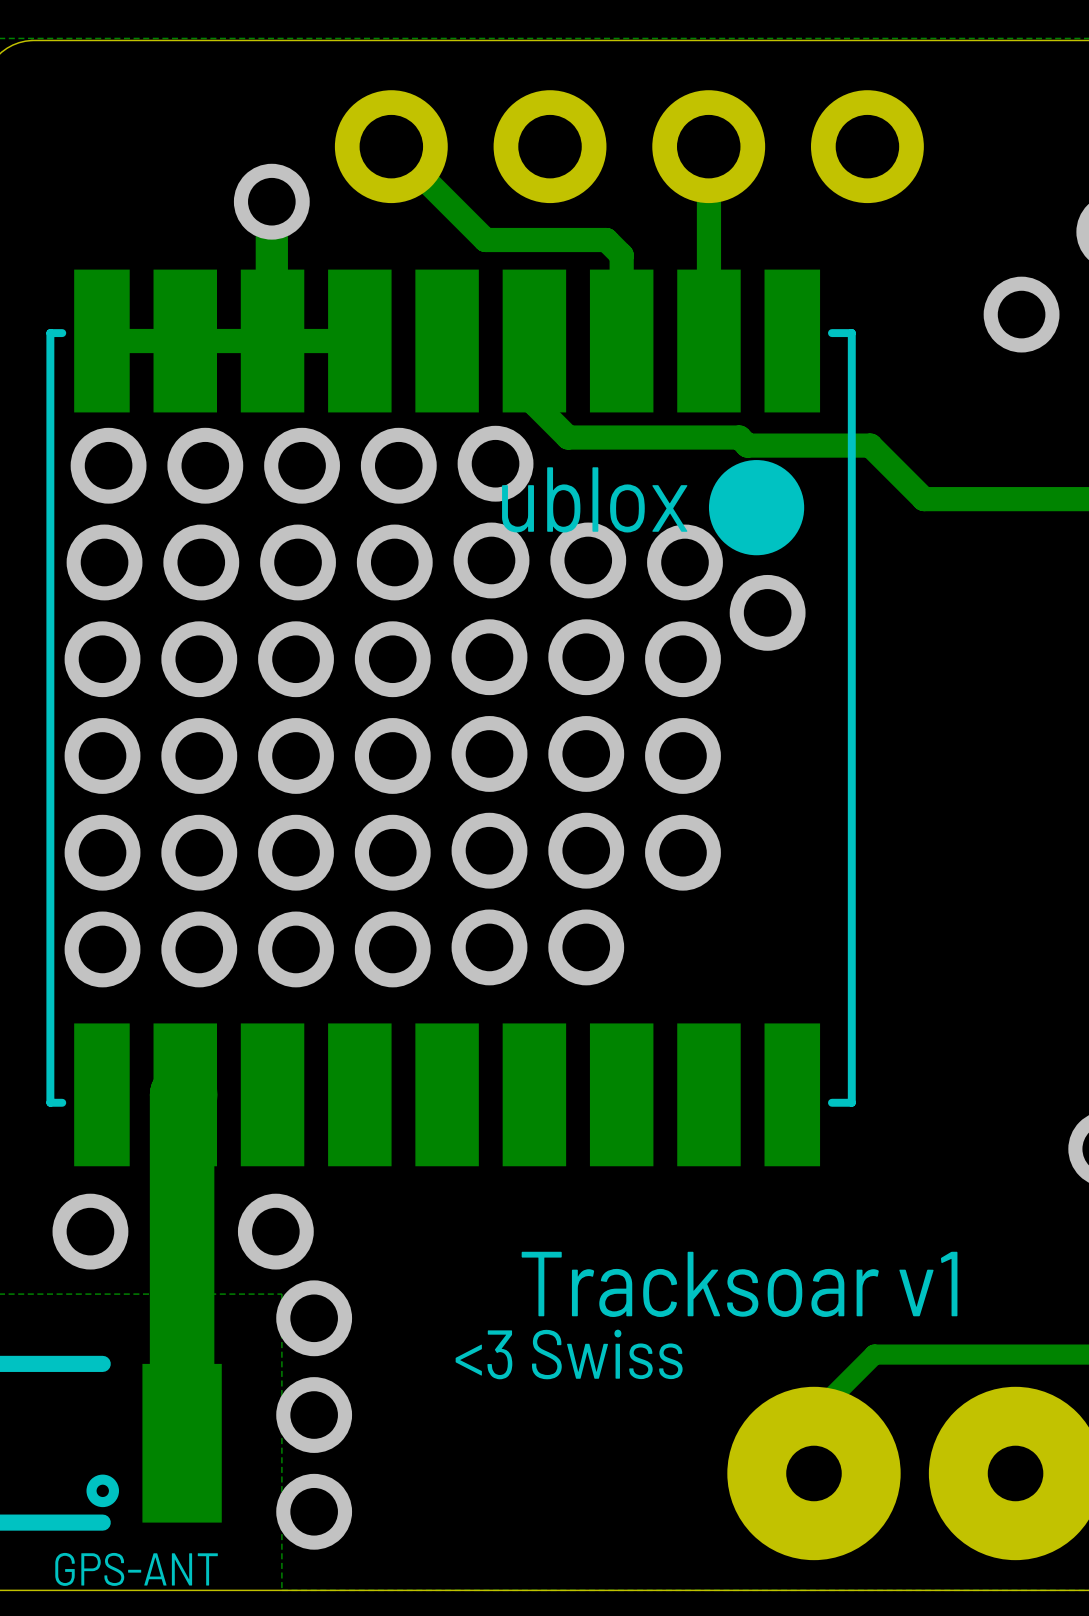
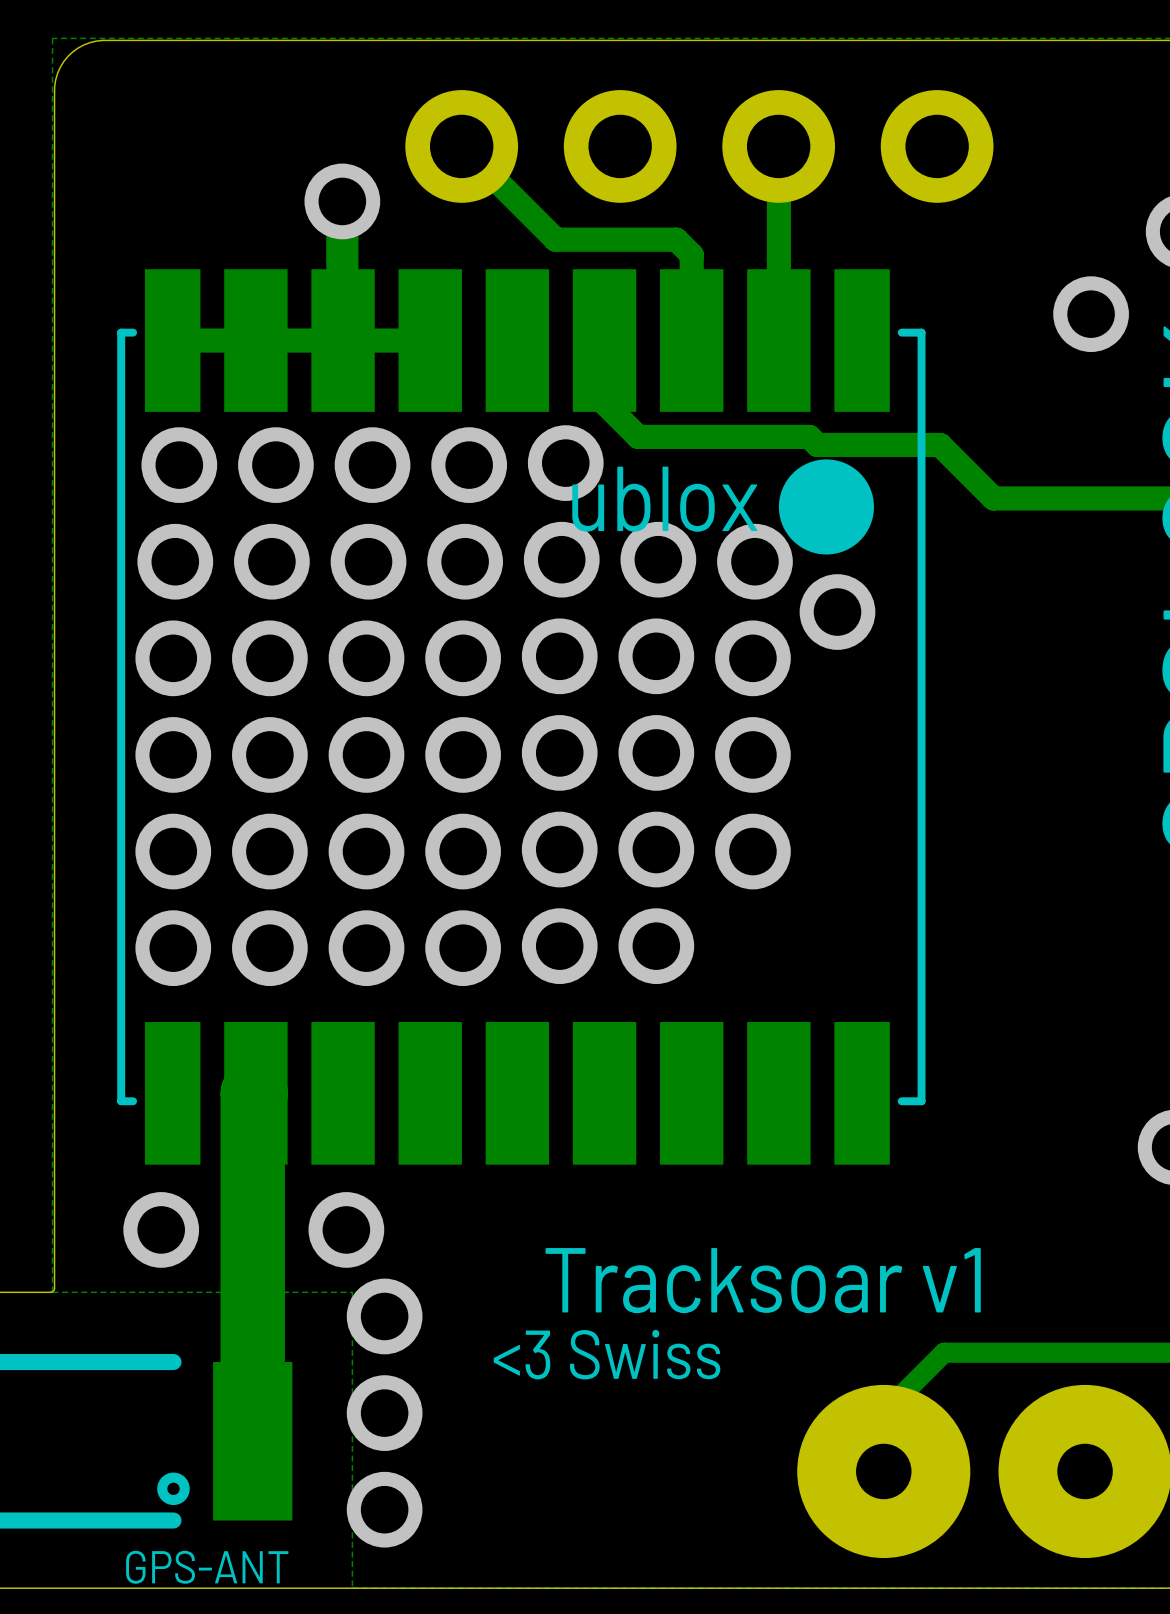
text position: Tracksoar v1 (739, 1284) -> Tracksoar v1 (763, 1280)
text position: <3 Swiss (569, 1354) -> <3 Swiss (607, 1354)

